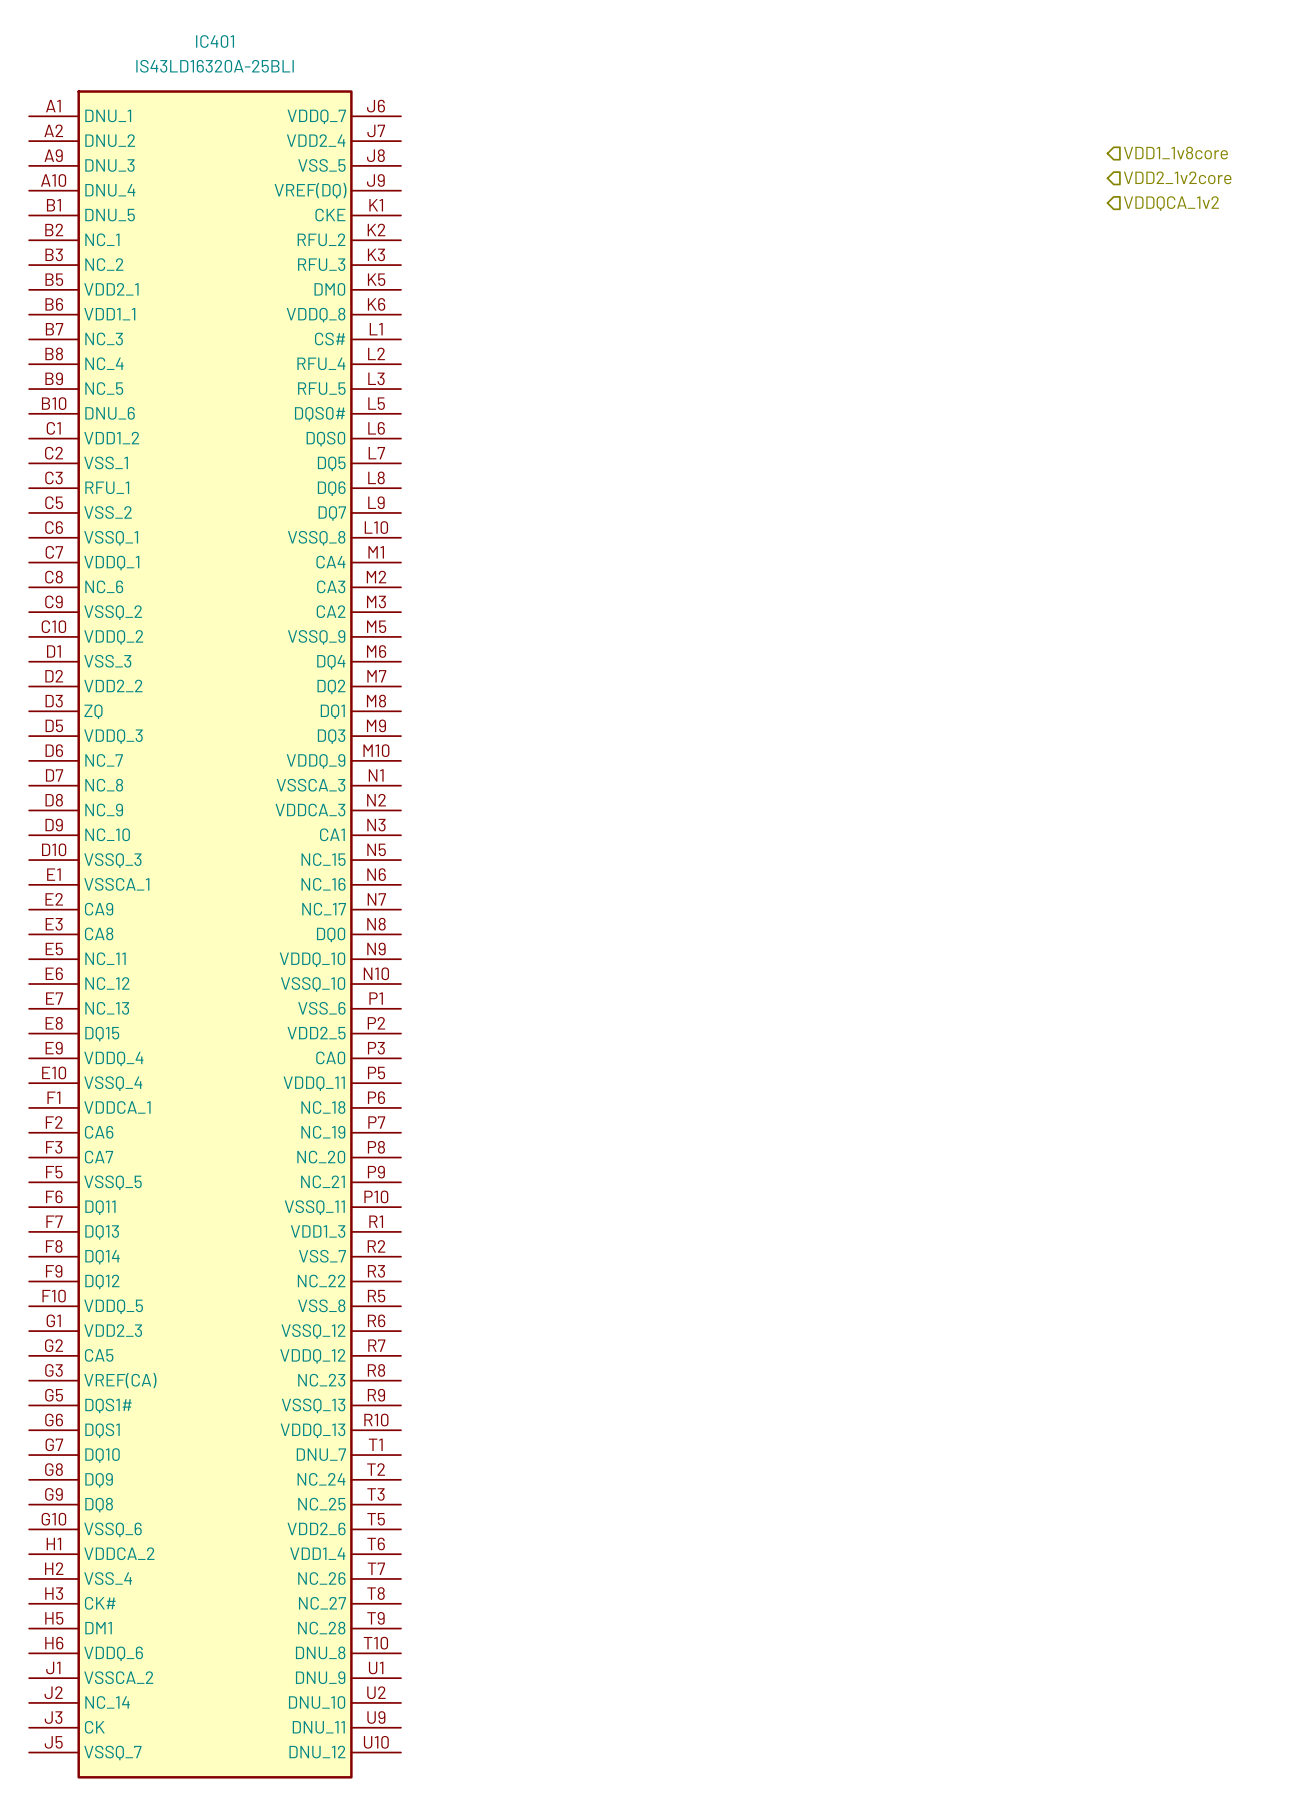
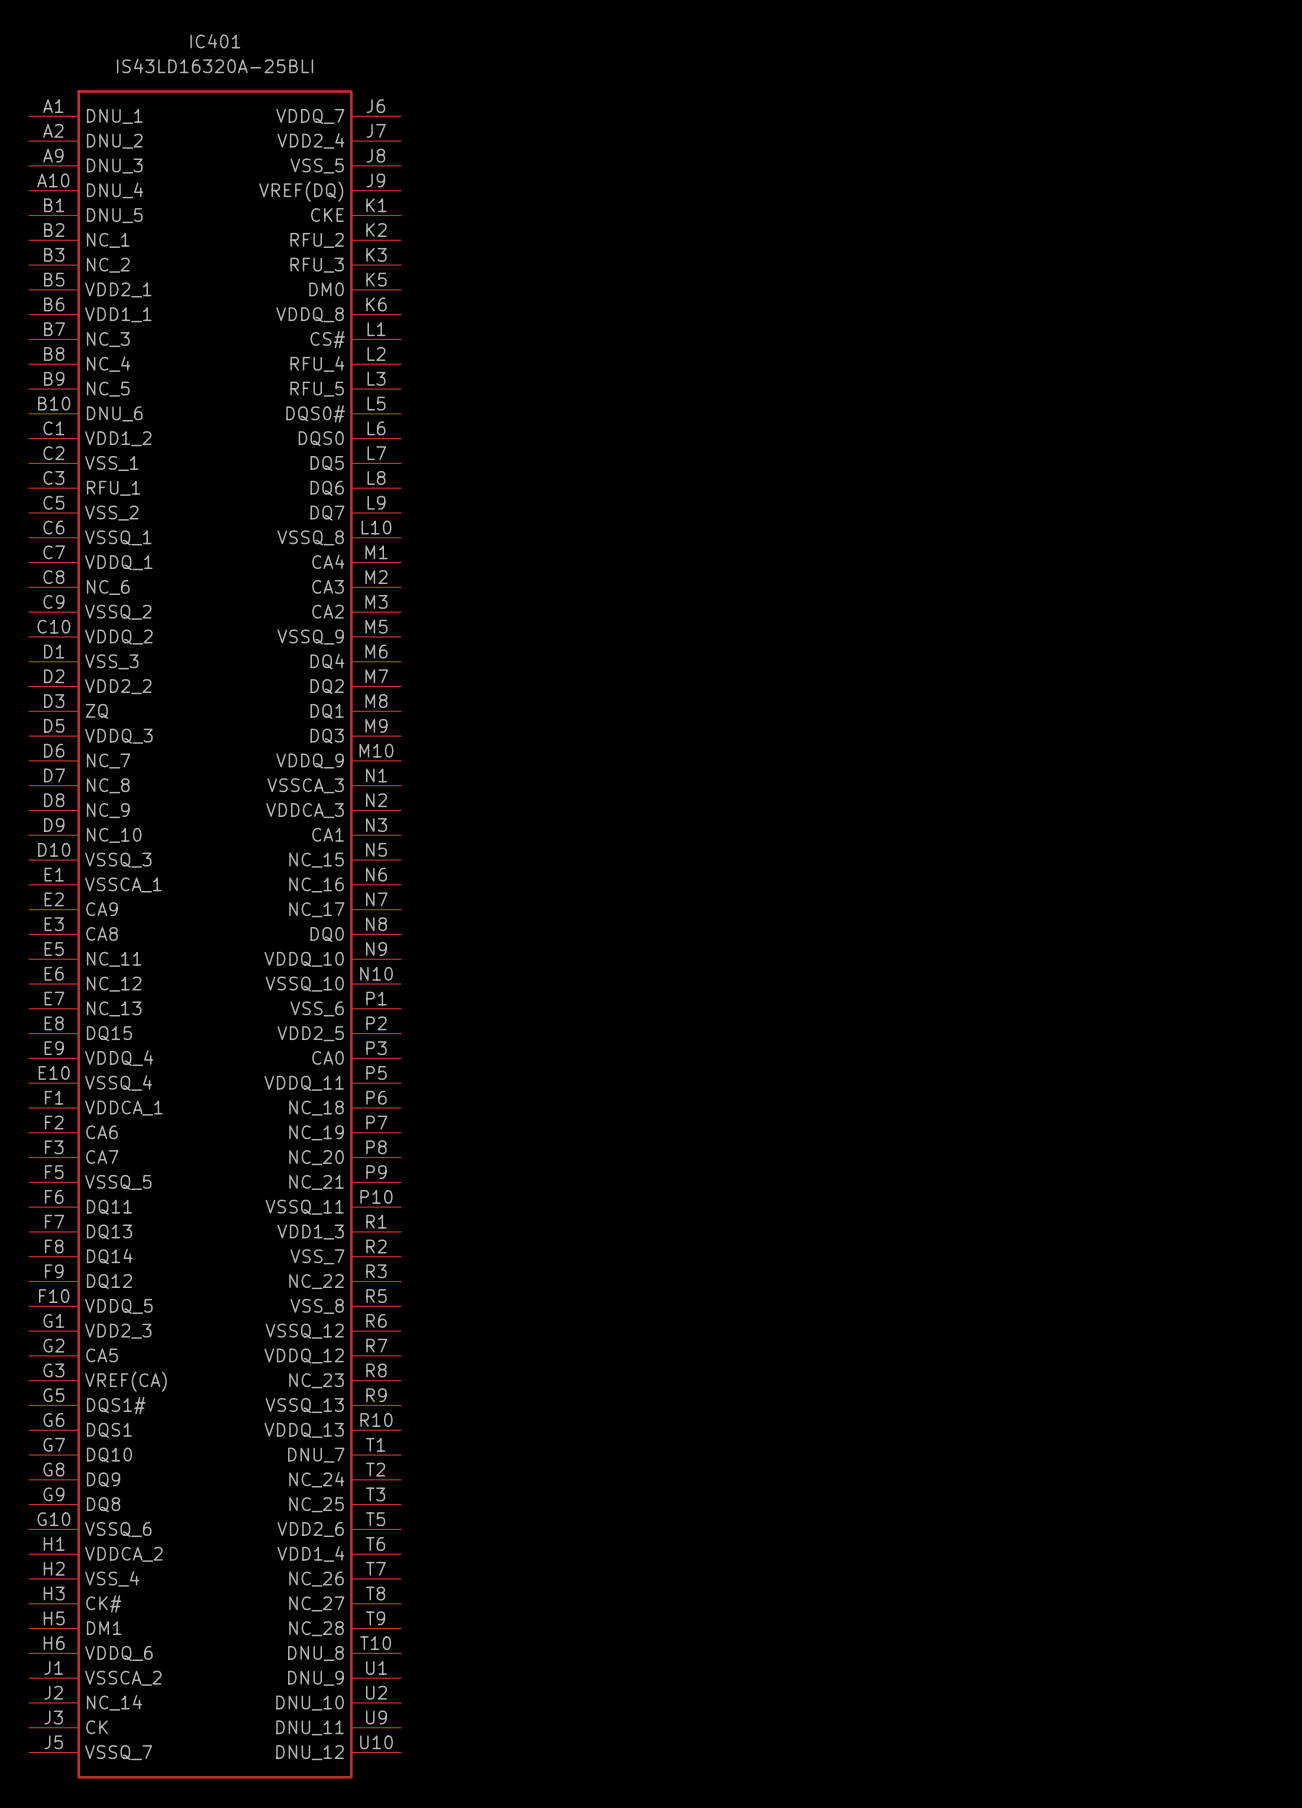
hierarchical label: VDD1_1v8core (1175, 153) -> none
hierarchical label: VDD2_1v2core (1177, 177) -> none
hierarchical label: VDDQCA_1v2 (1171, 203) -> none

